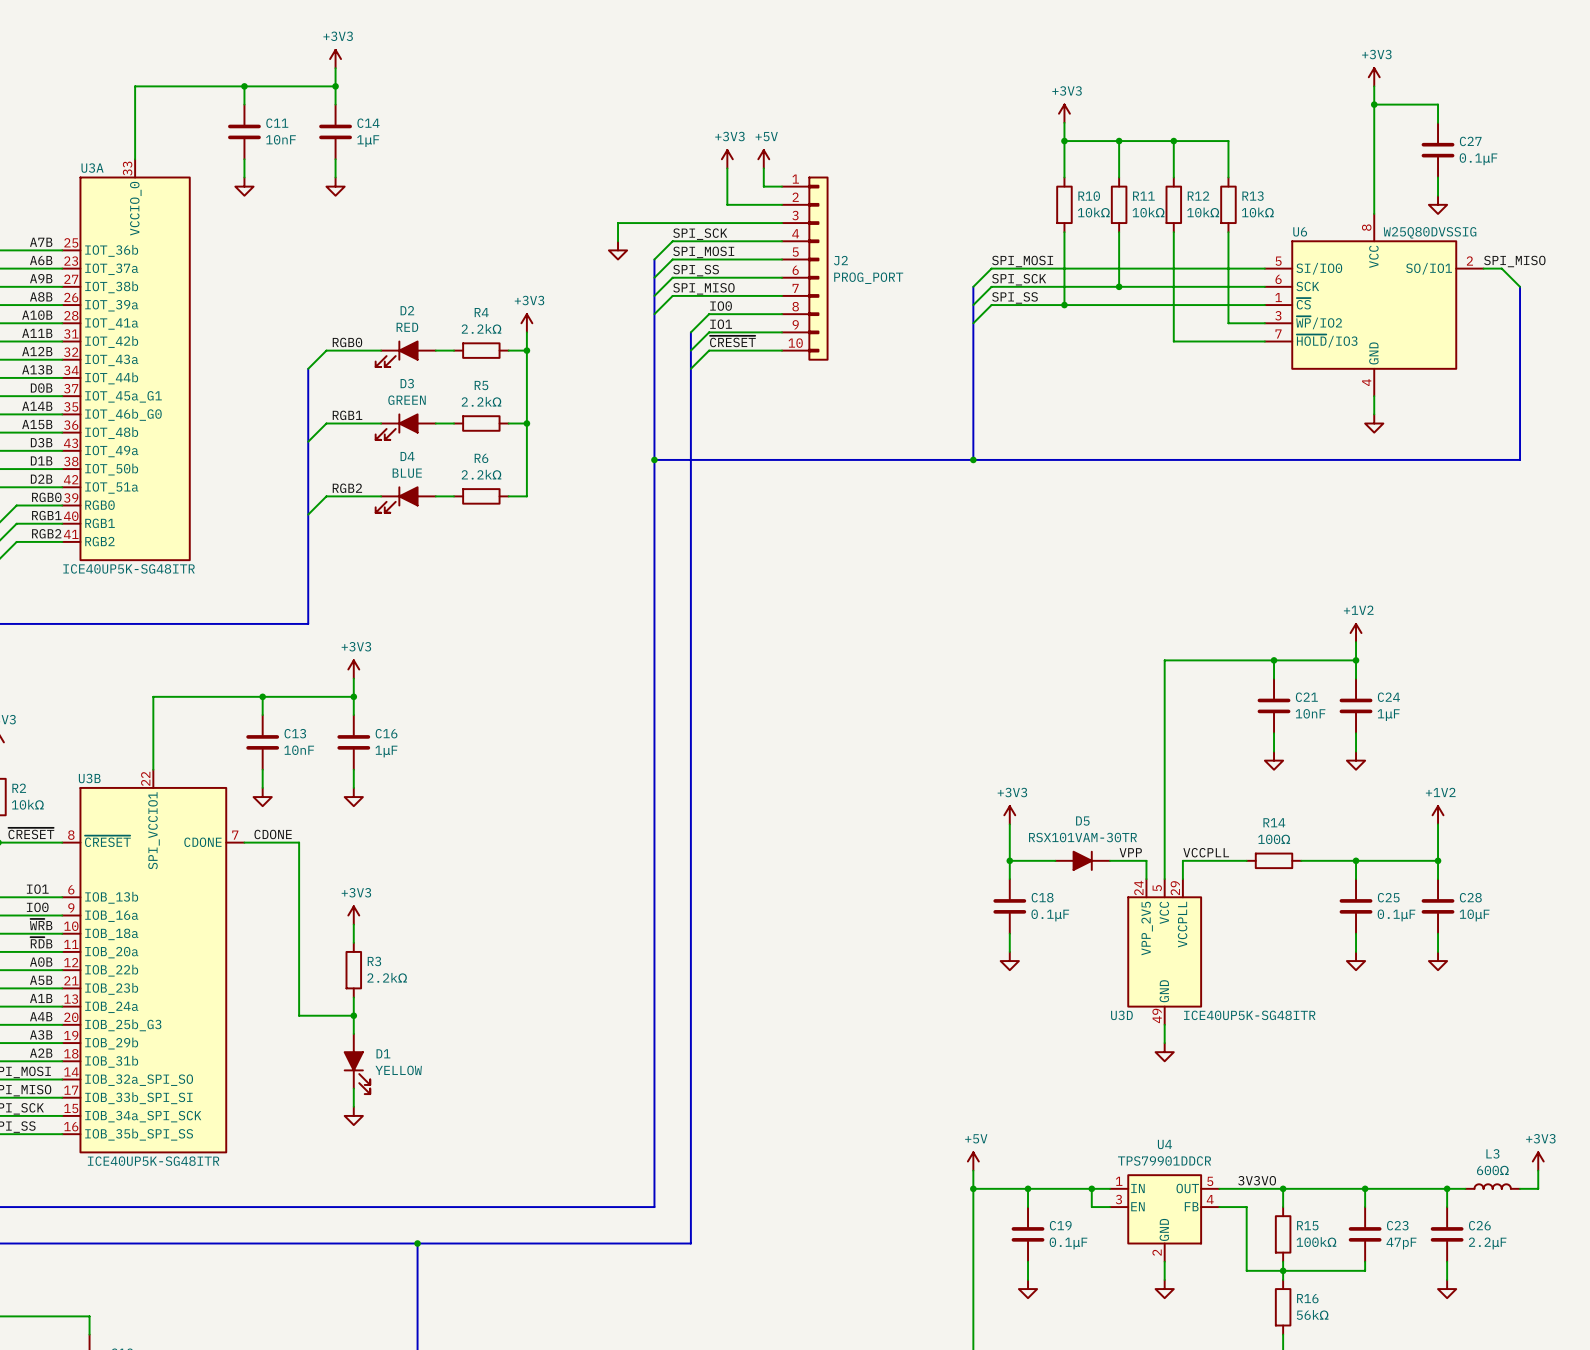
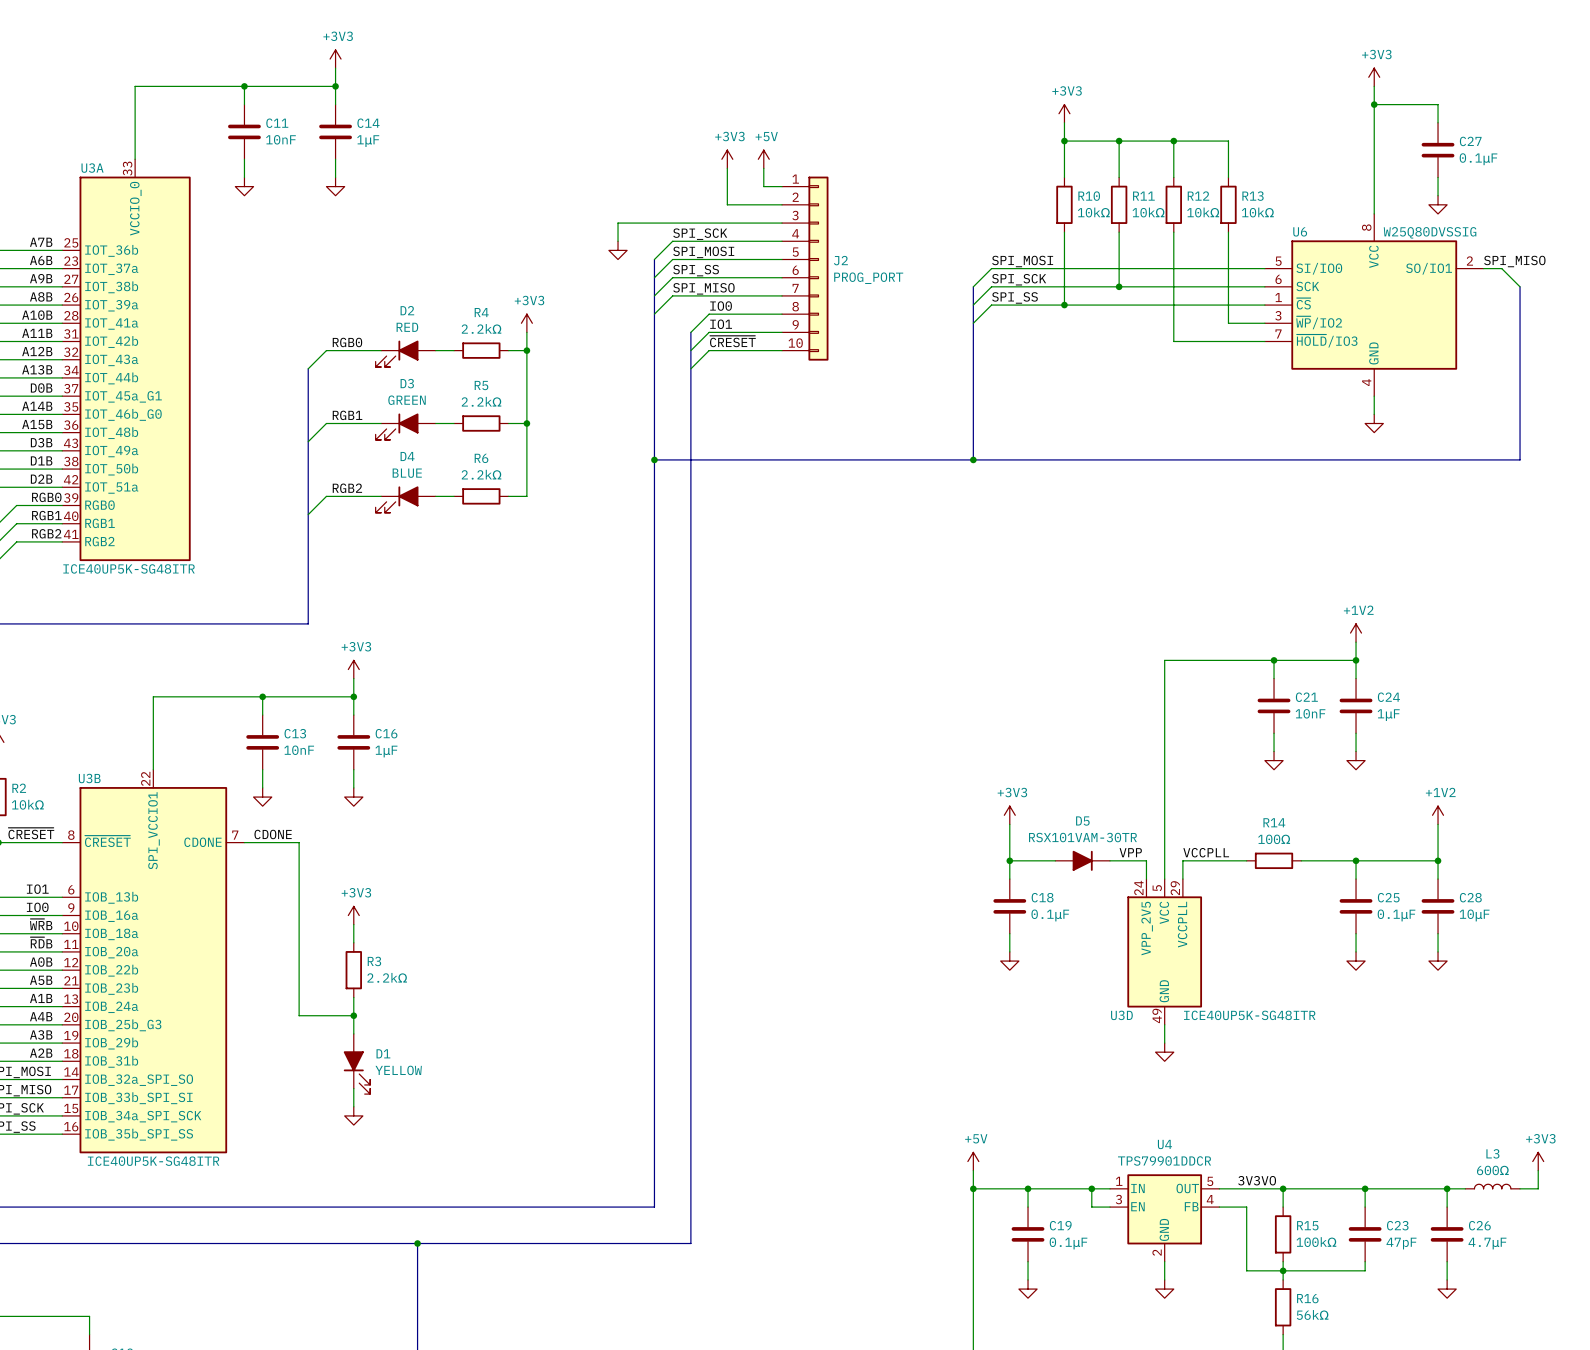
C26 value: 2.2μF (1487, 1243) -> 4.7μF (1487, 1243)

